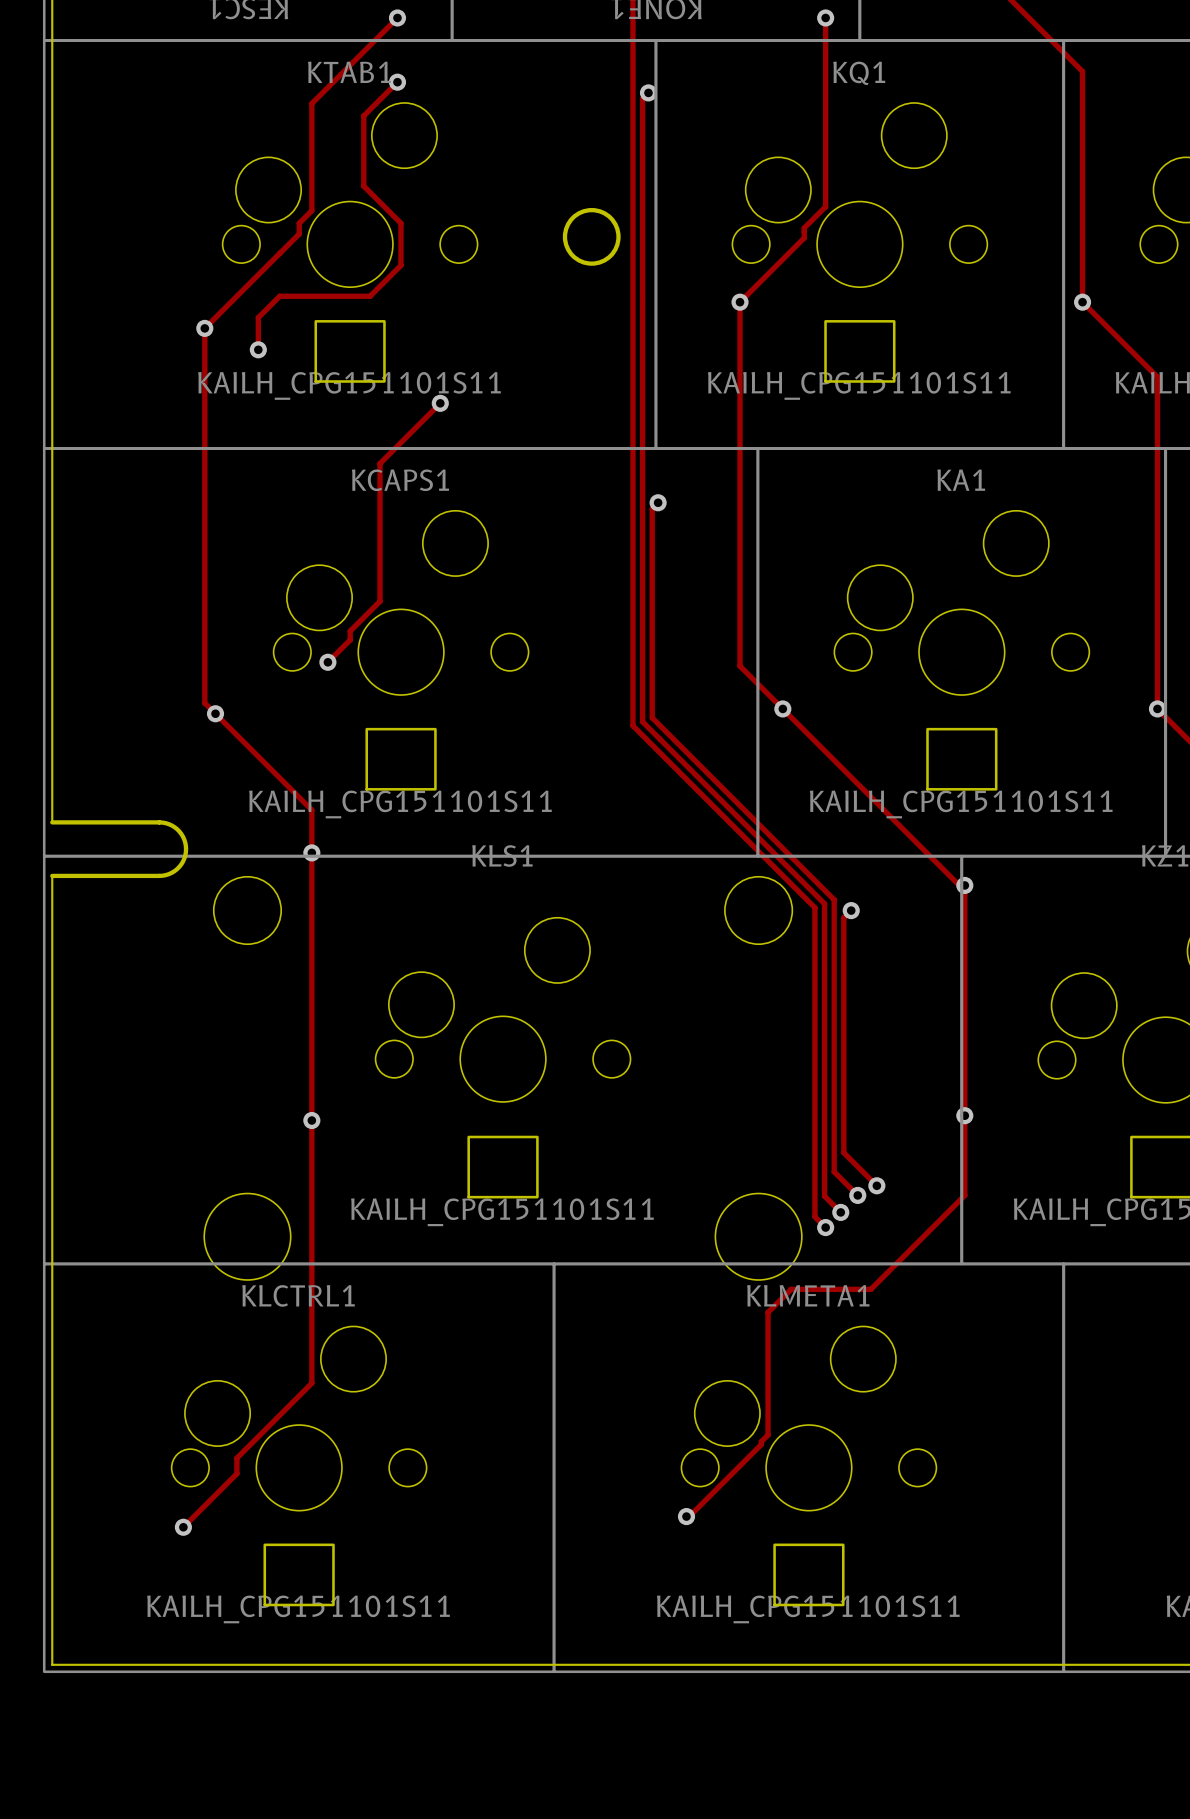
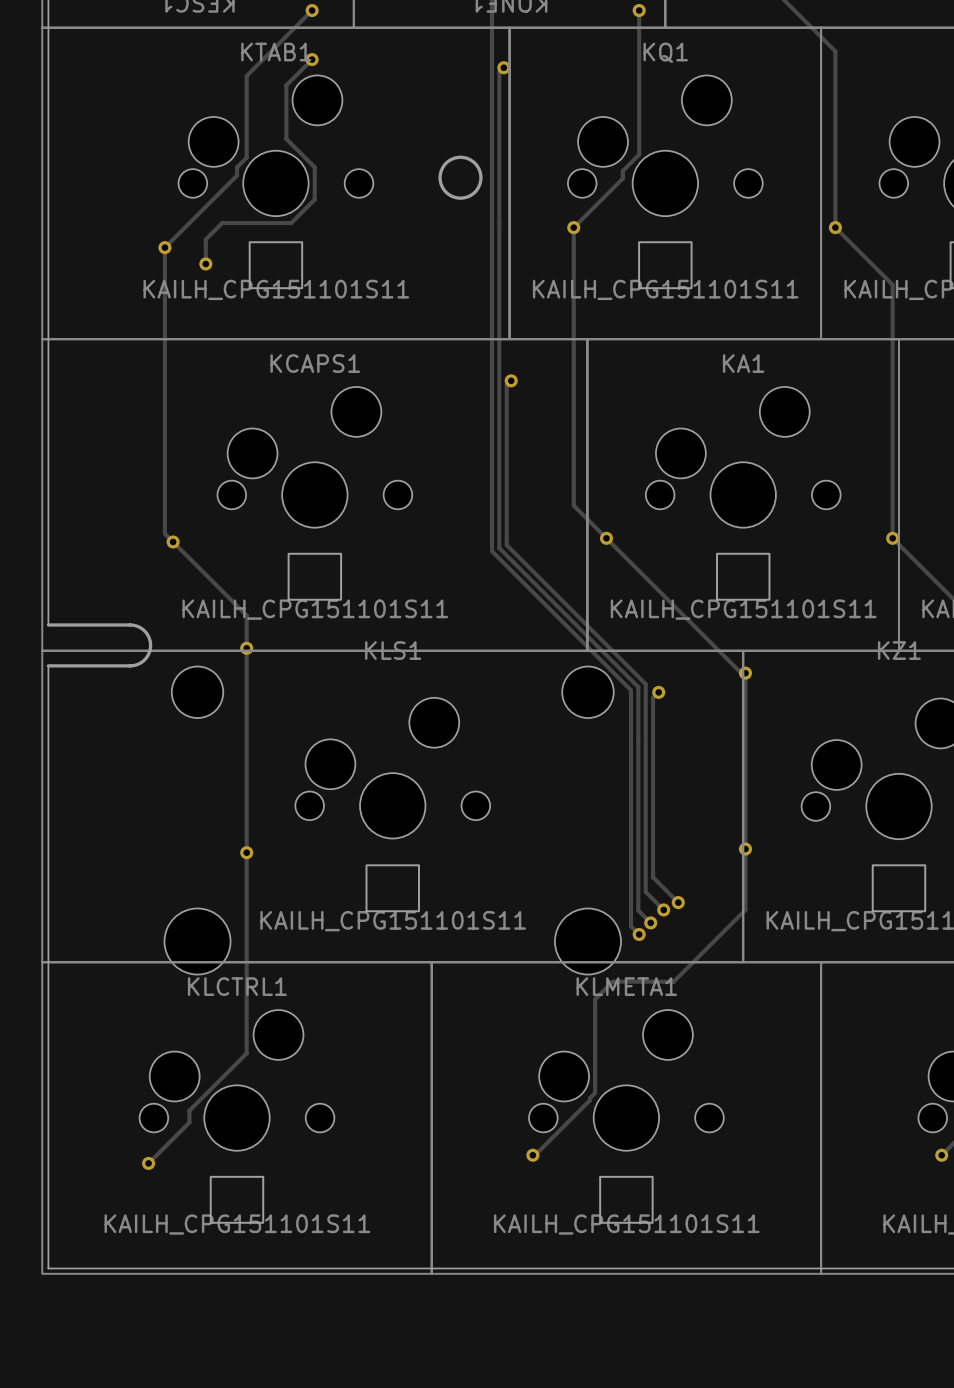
track: (440, 403) (380, 463) (380, 601) (350, 631) (350, 639) (327, 662) -> none
via: (440, 403) -> none
via: (327, 662) -> none

